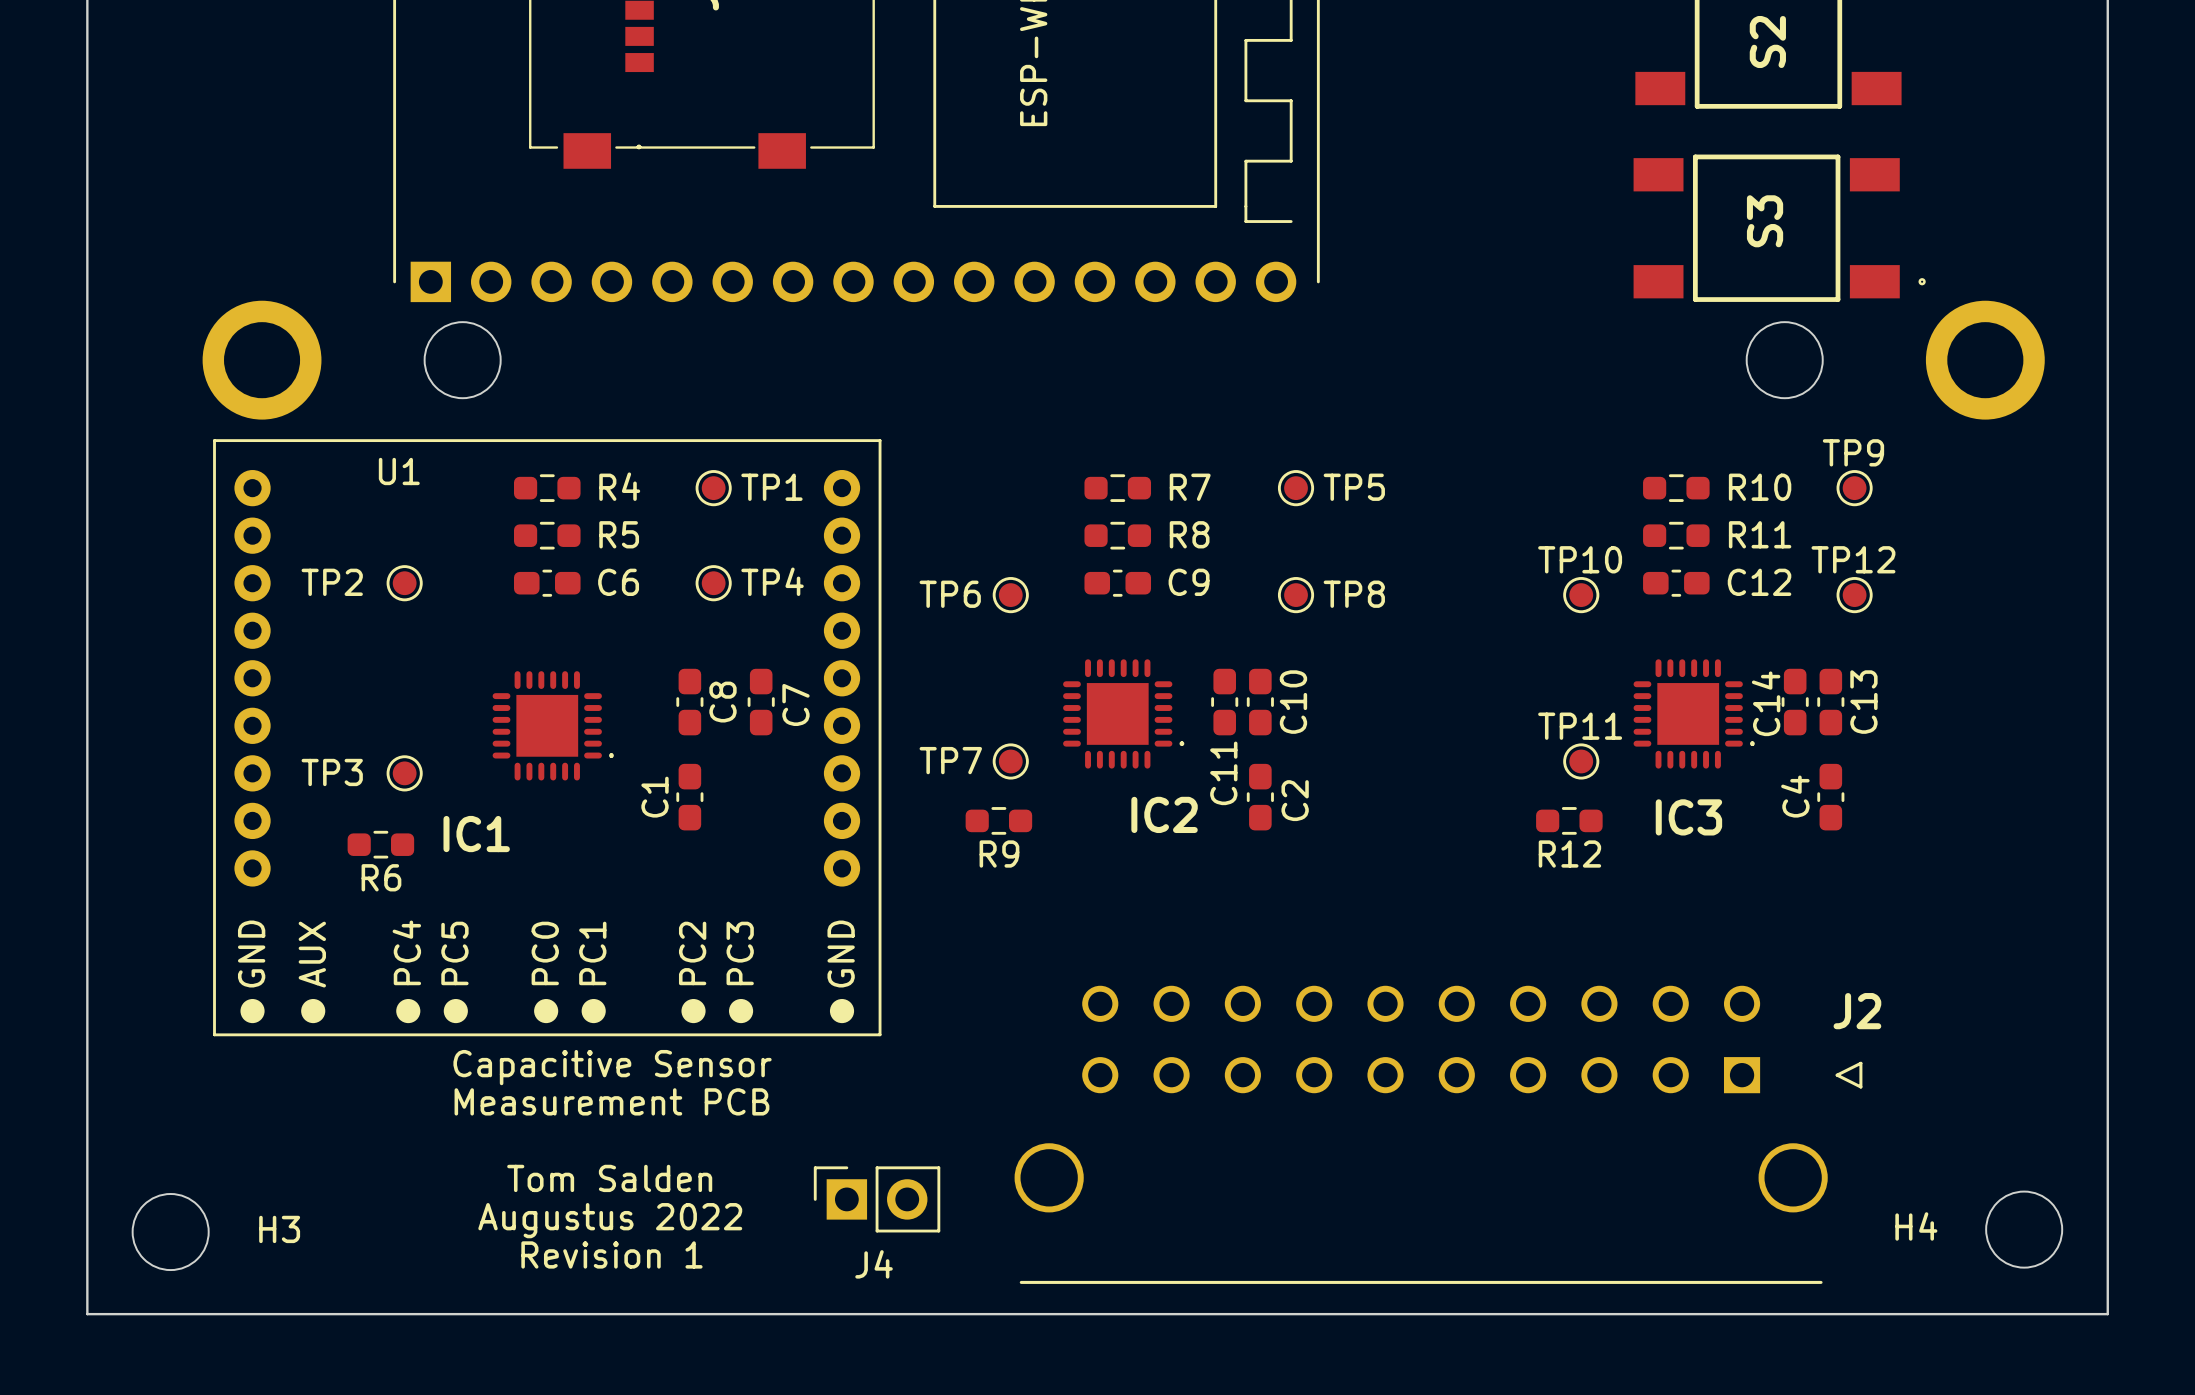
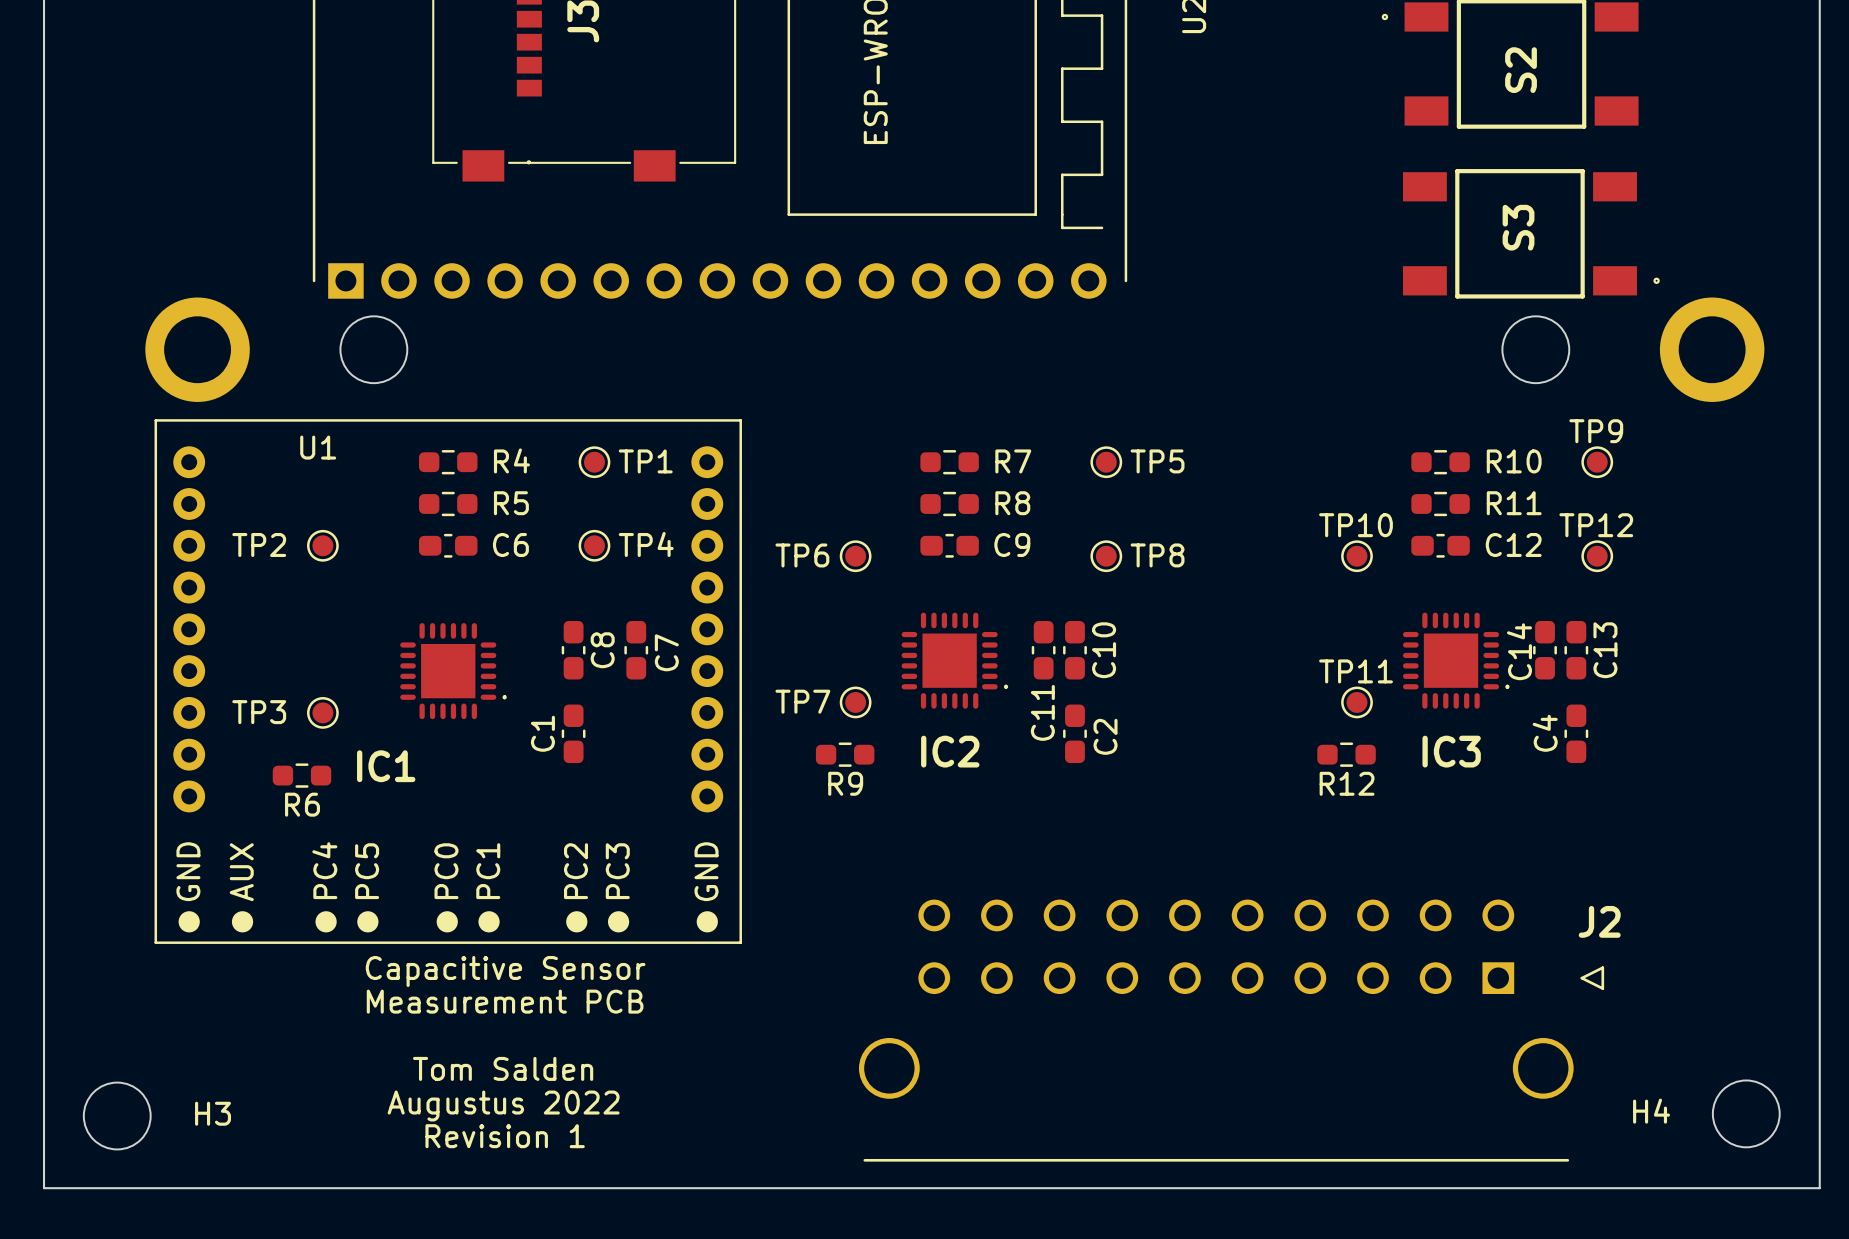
IC2 name position: IC2 (1164, 814) -> IC2 (950, 751)
J4: (877, 1199) -> none

